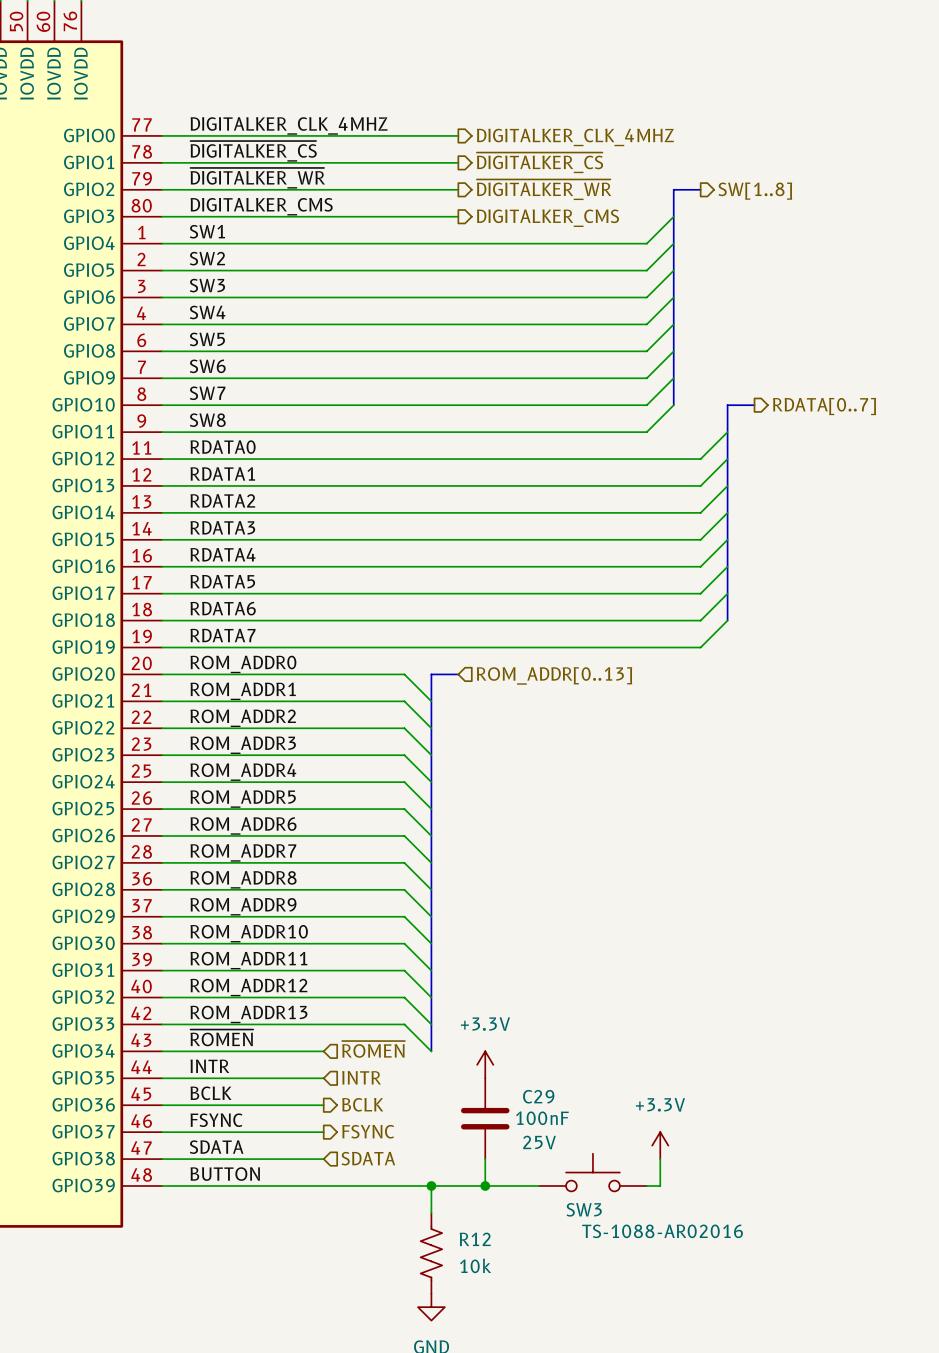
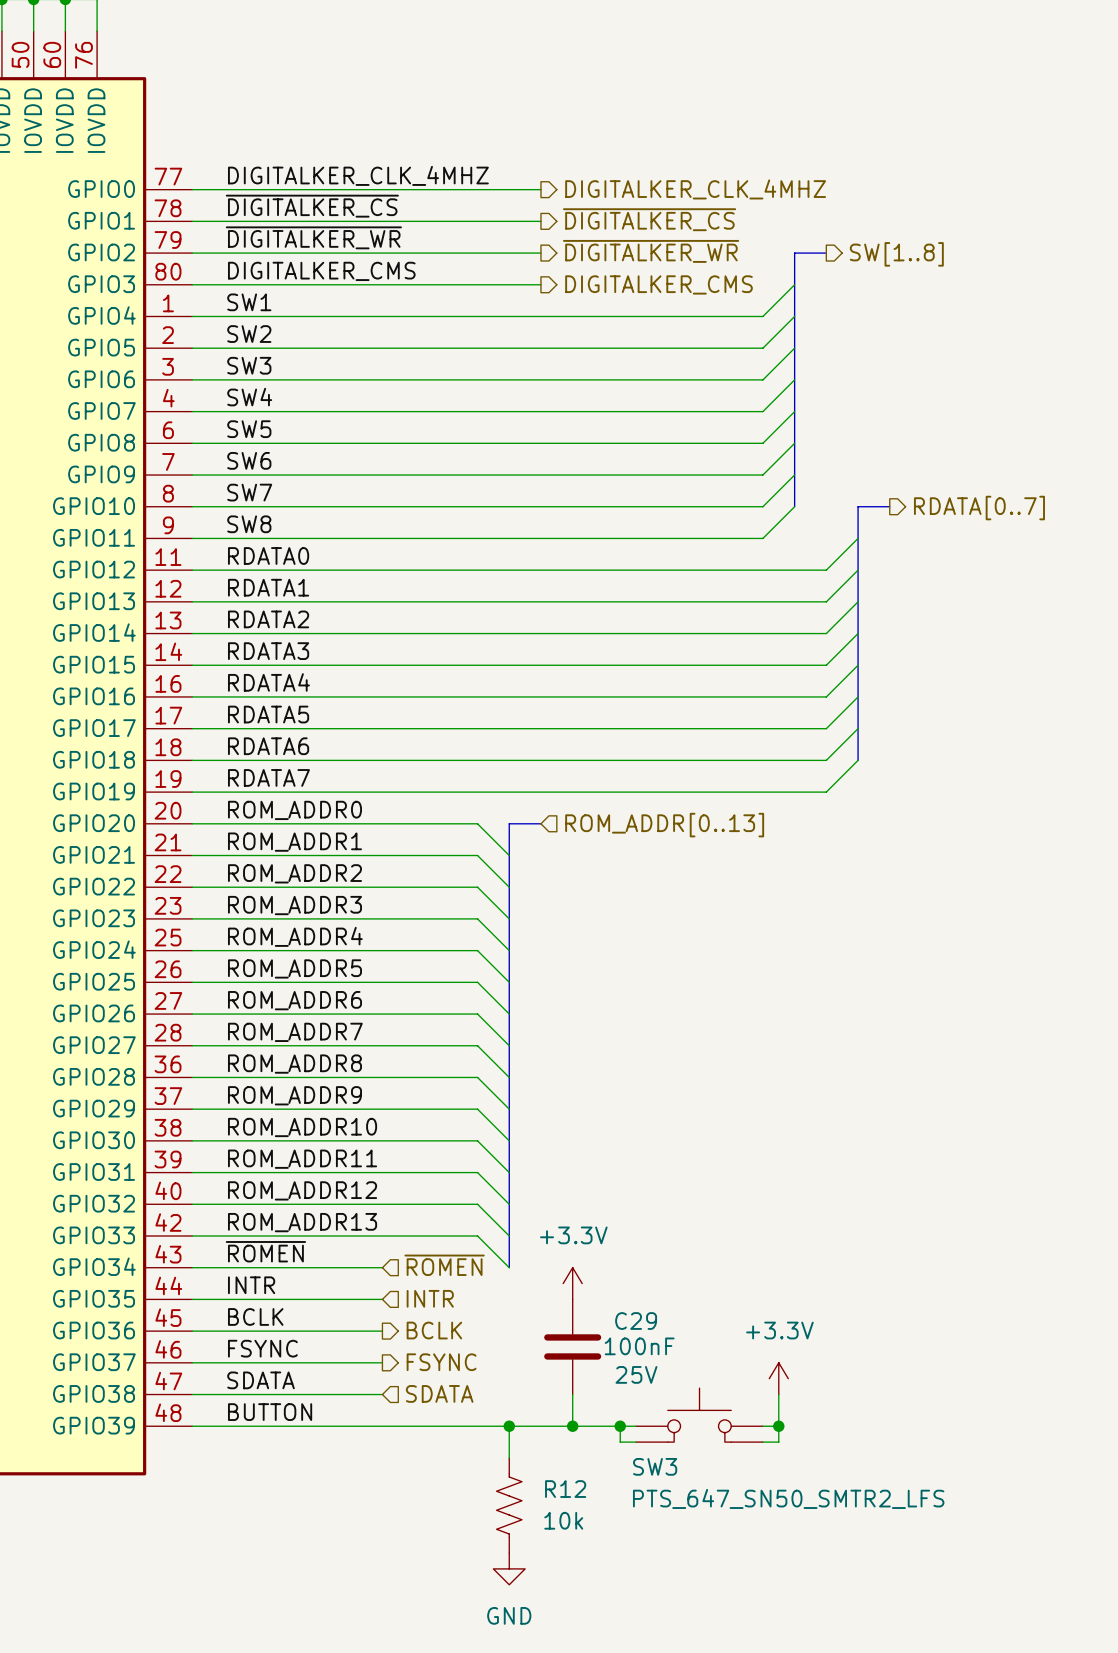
SW3 symbol: [539, 1153, 647, 1192] -> [636, 1388, 763, 1443]
wire: none -> (620, 1426) (620, 1442) (636, 1442)
junction: none -> (620, 1426)
wire: none -> (778, 1426) (778, 1442) (762, 1442)
junction: none -> (778, 1426)
SW3 name position: SW3 (584, 1209) -> SW3 (655, 1466)
SW3 value: TS-1088-AR02016 (662, 1231) -> PTS_647_SN50_SMTR2_LFS (788, 1498)

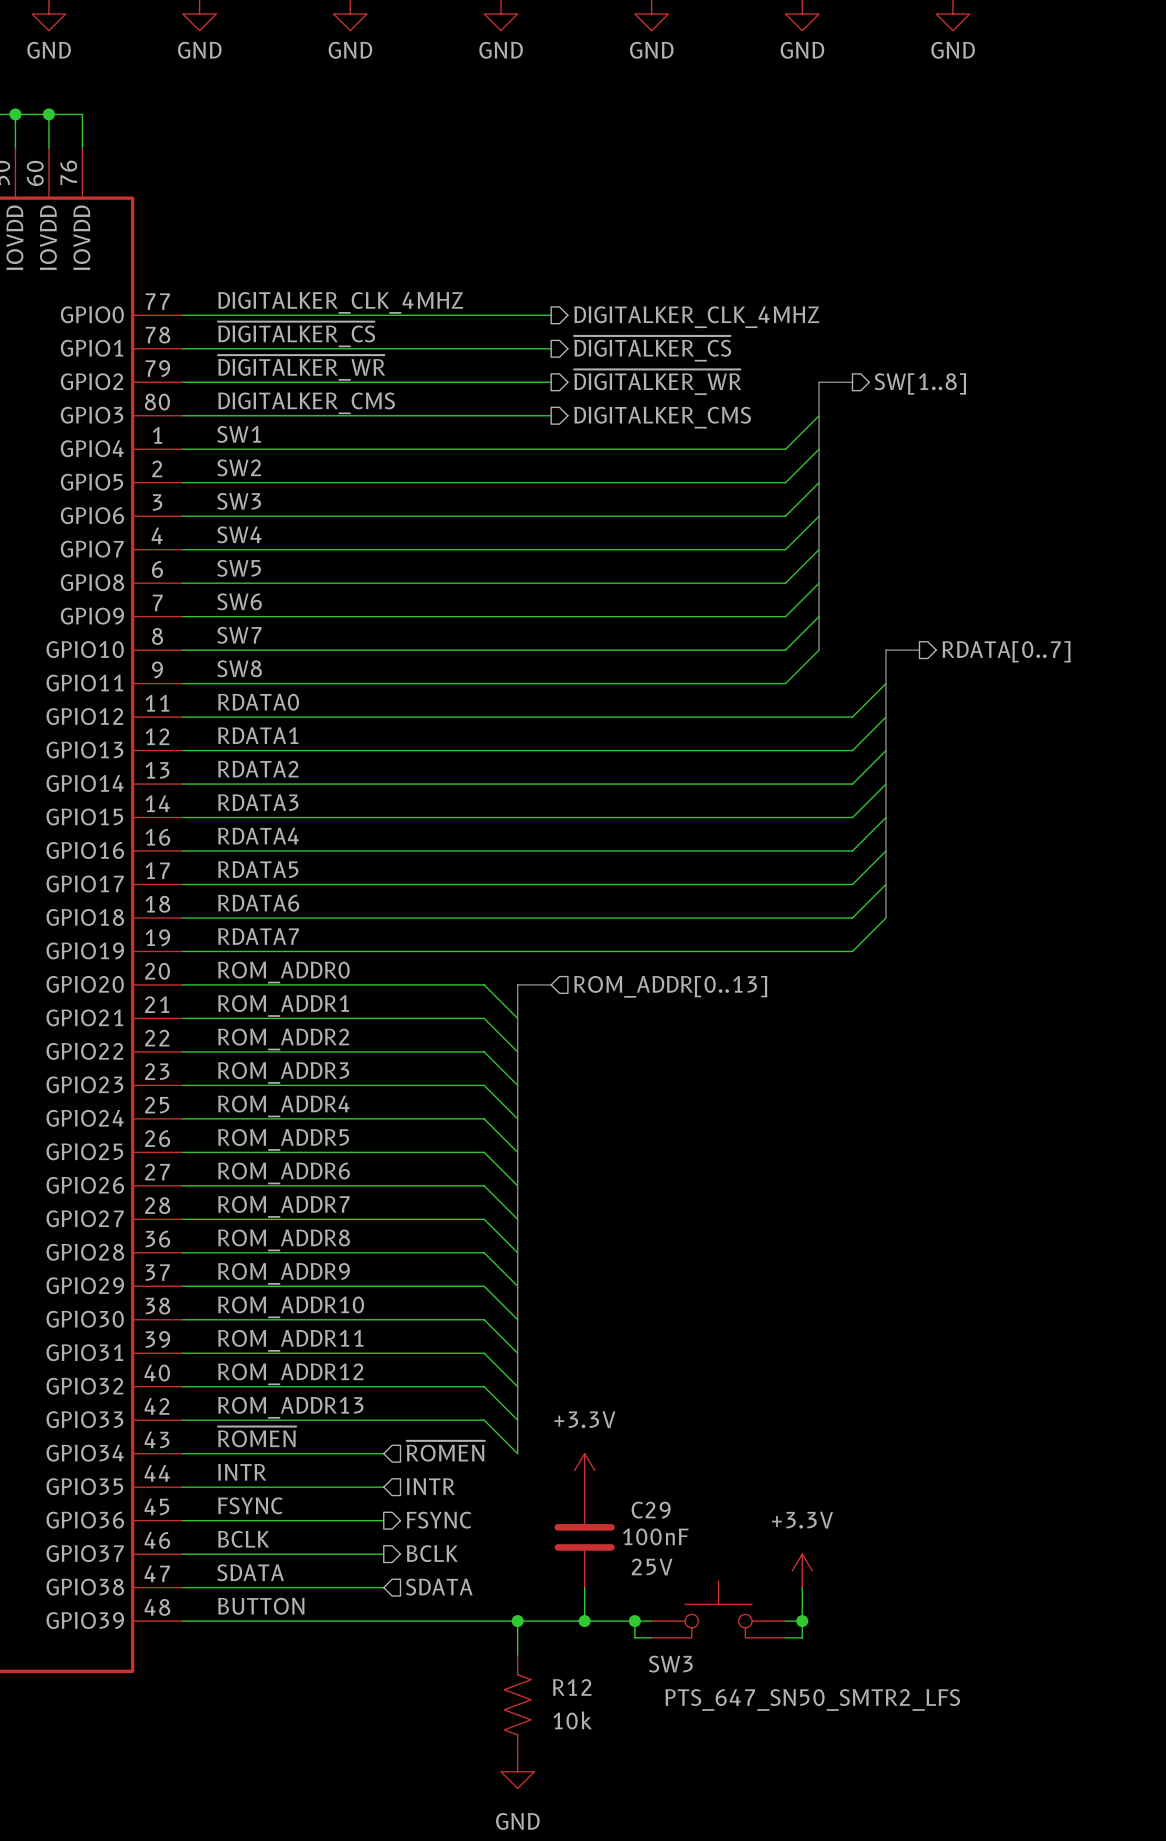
label: BCLK (255, 1316) -> FSYNC (250, 1505)
hierarchical label: BCLK (434, 1330) -> FSYNC (439, 1520)
label: FSYNC (262, 1348) -> BCLK (243, 1539)
hierarchical label: FSYNC (441, 1362) -> BCLK (432, 1553)

